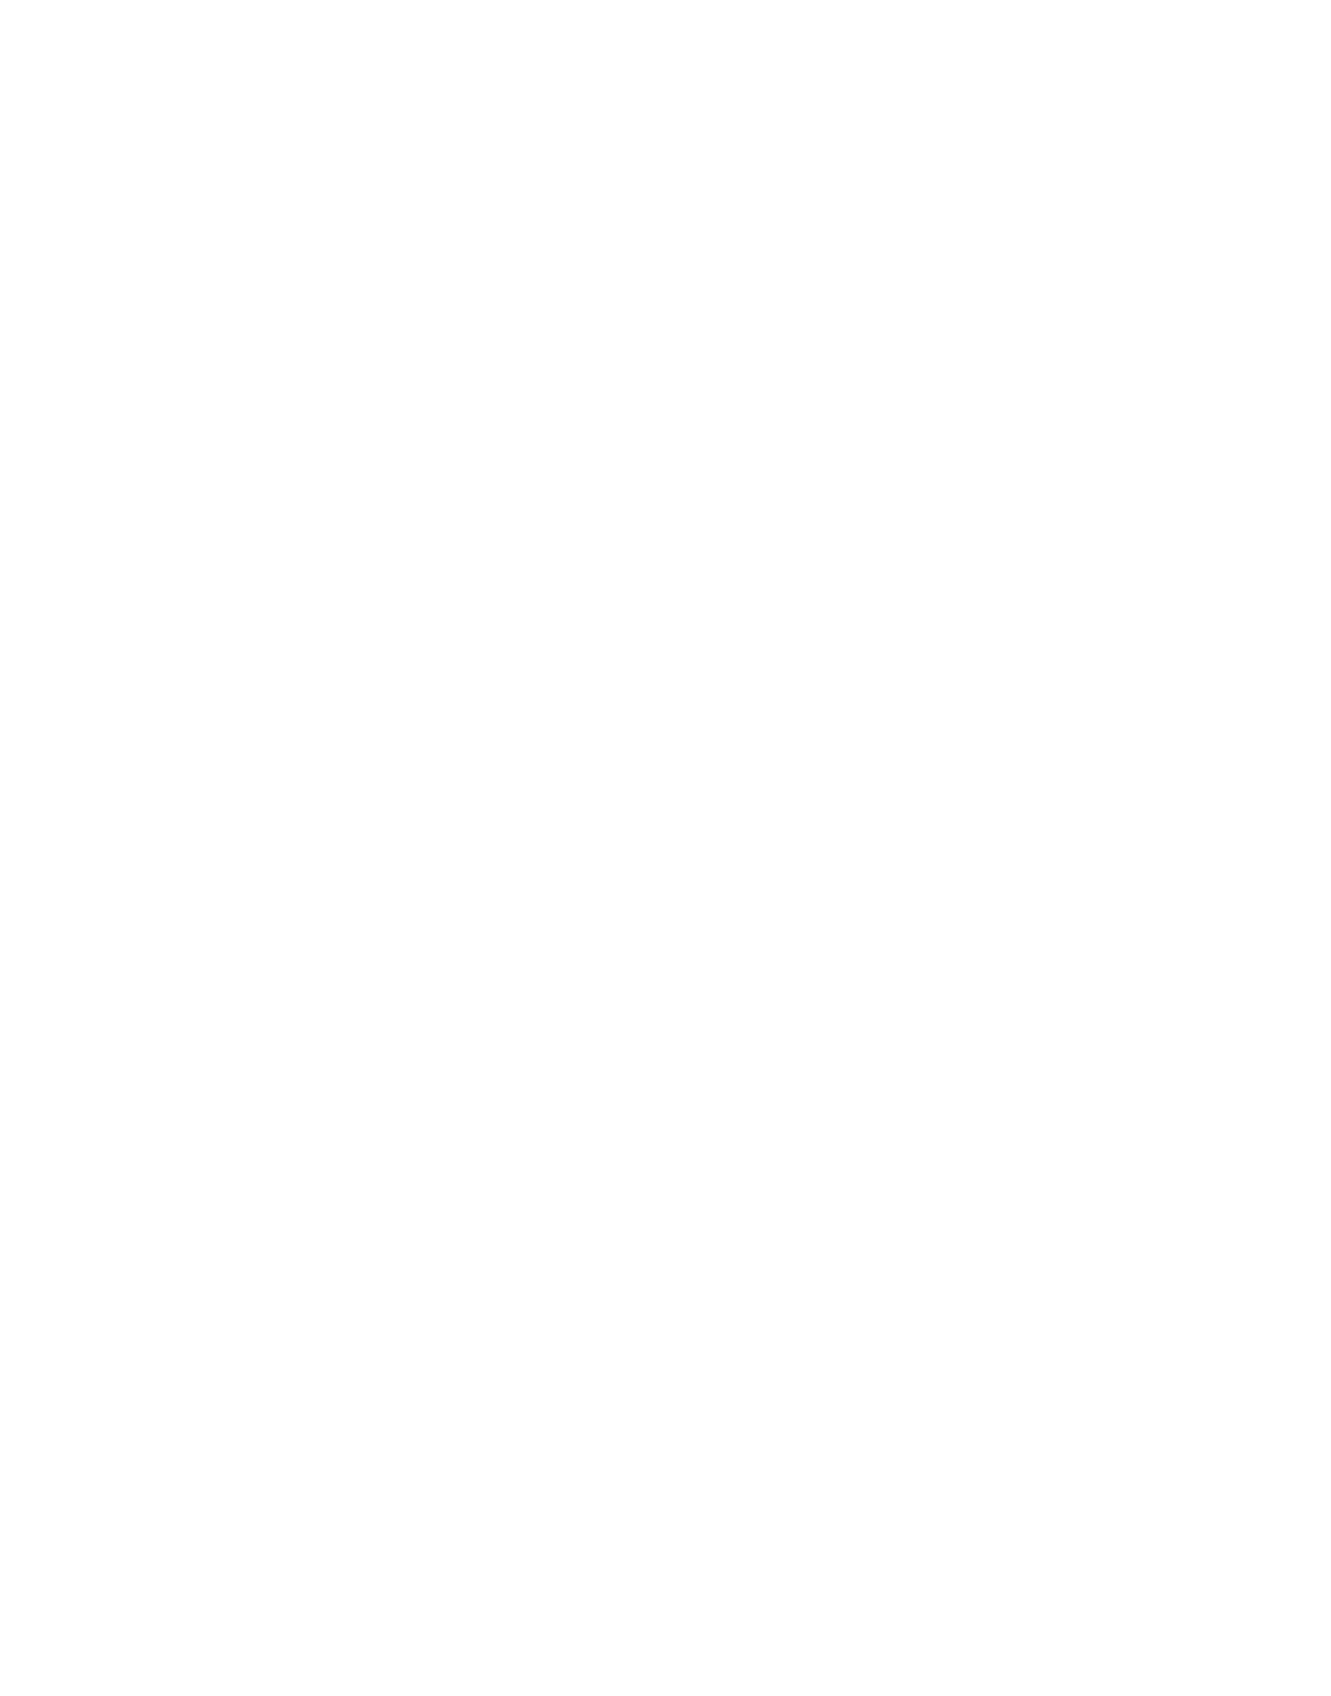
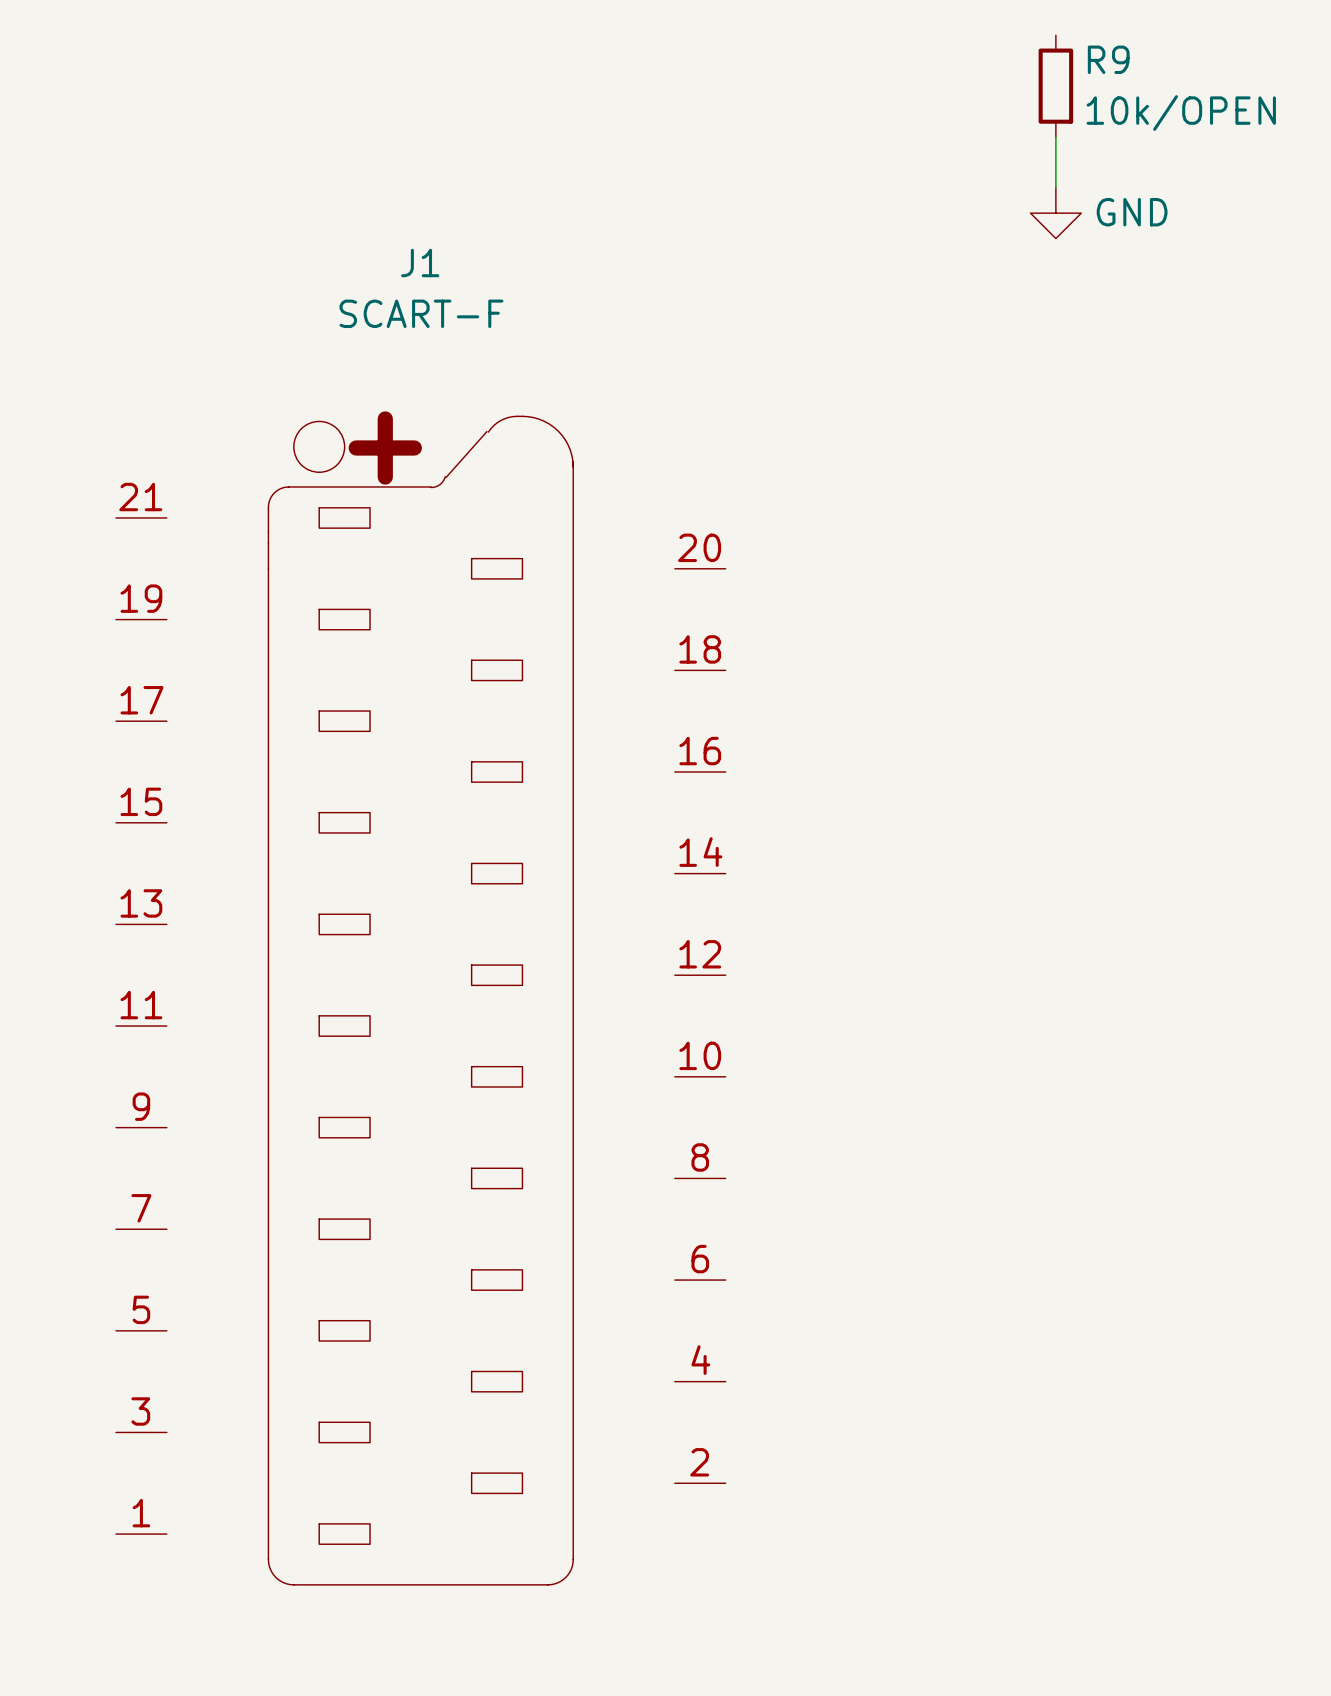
R9: none -> 10k/OPEN (1055, 86)
wire: none -> (1055, 136) (1055, 187)
power symbol: none -> GND (1055, 213)
J1: none -> SCART-F (420, 1000)

